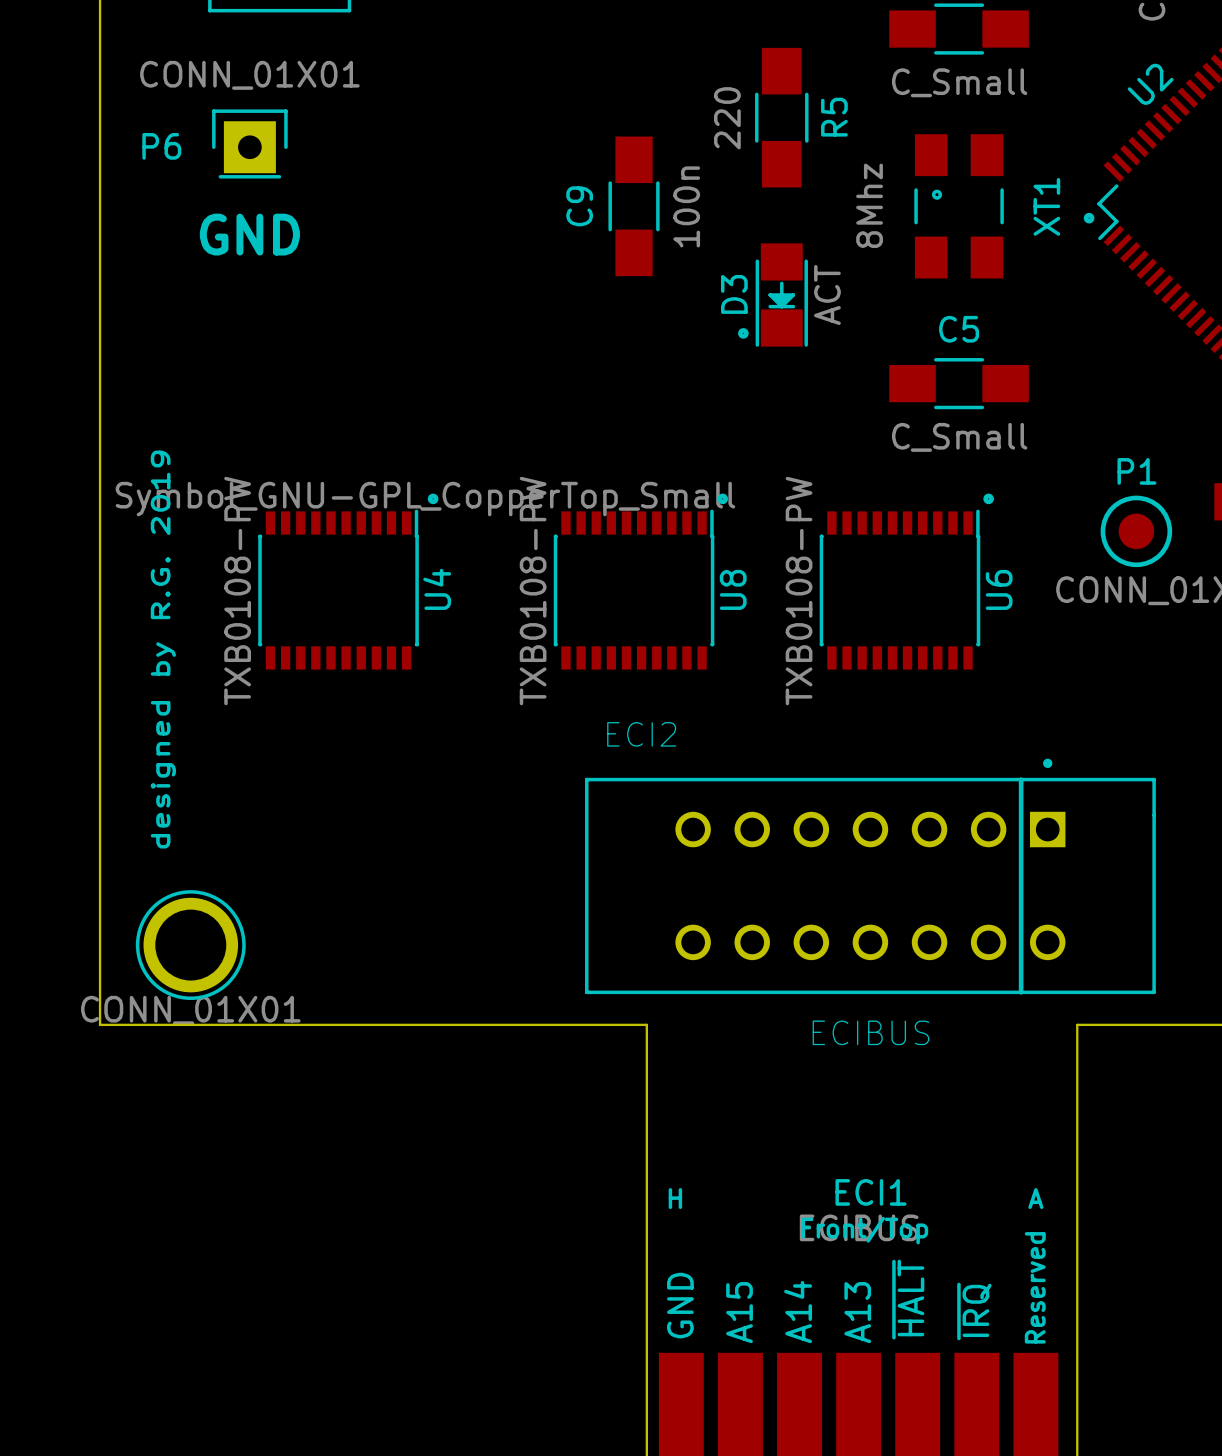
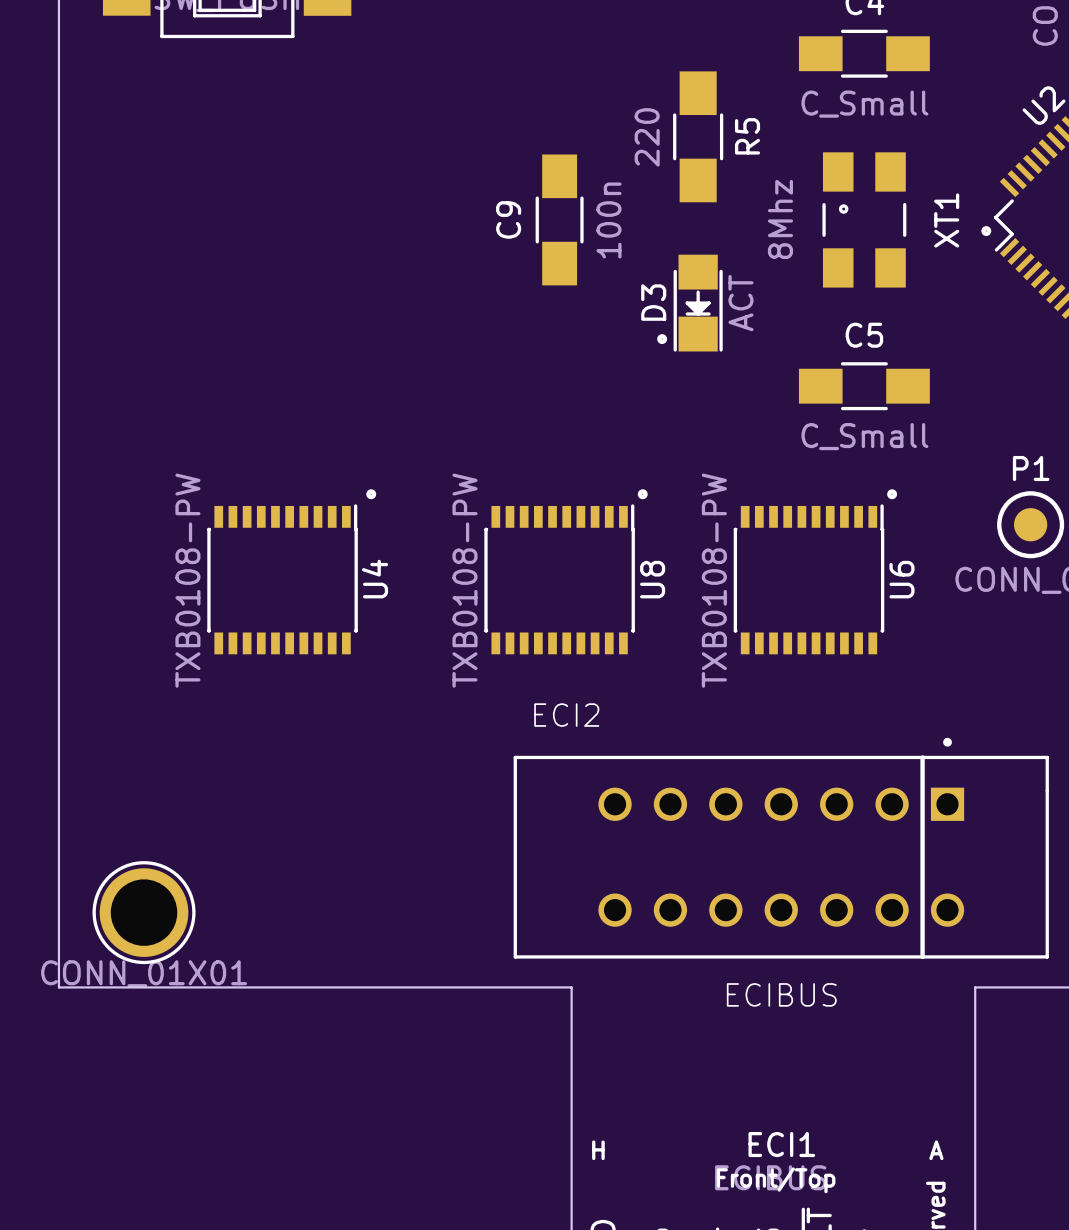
P6: CONN_01X01 (249, 143) -> none
text: GND (249, 234) -> none
drawing: [115, 481, 736, 517] -> none
text: designed by R.G. 2019 (163, 649) -> none

